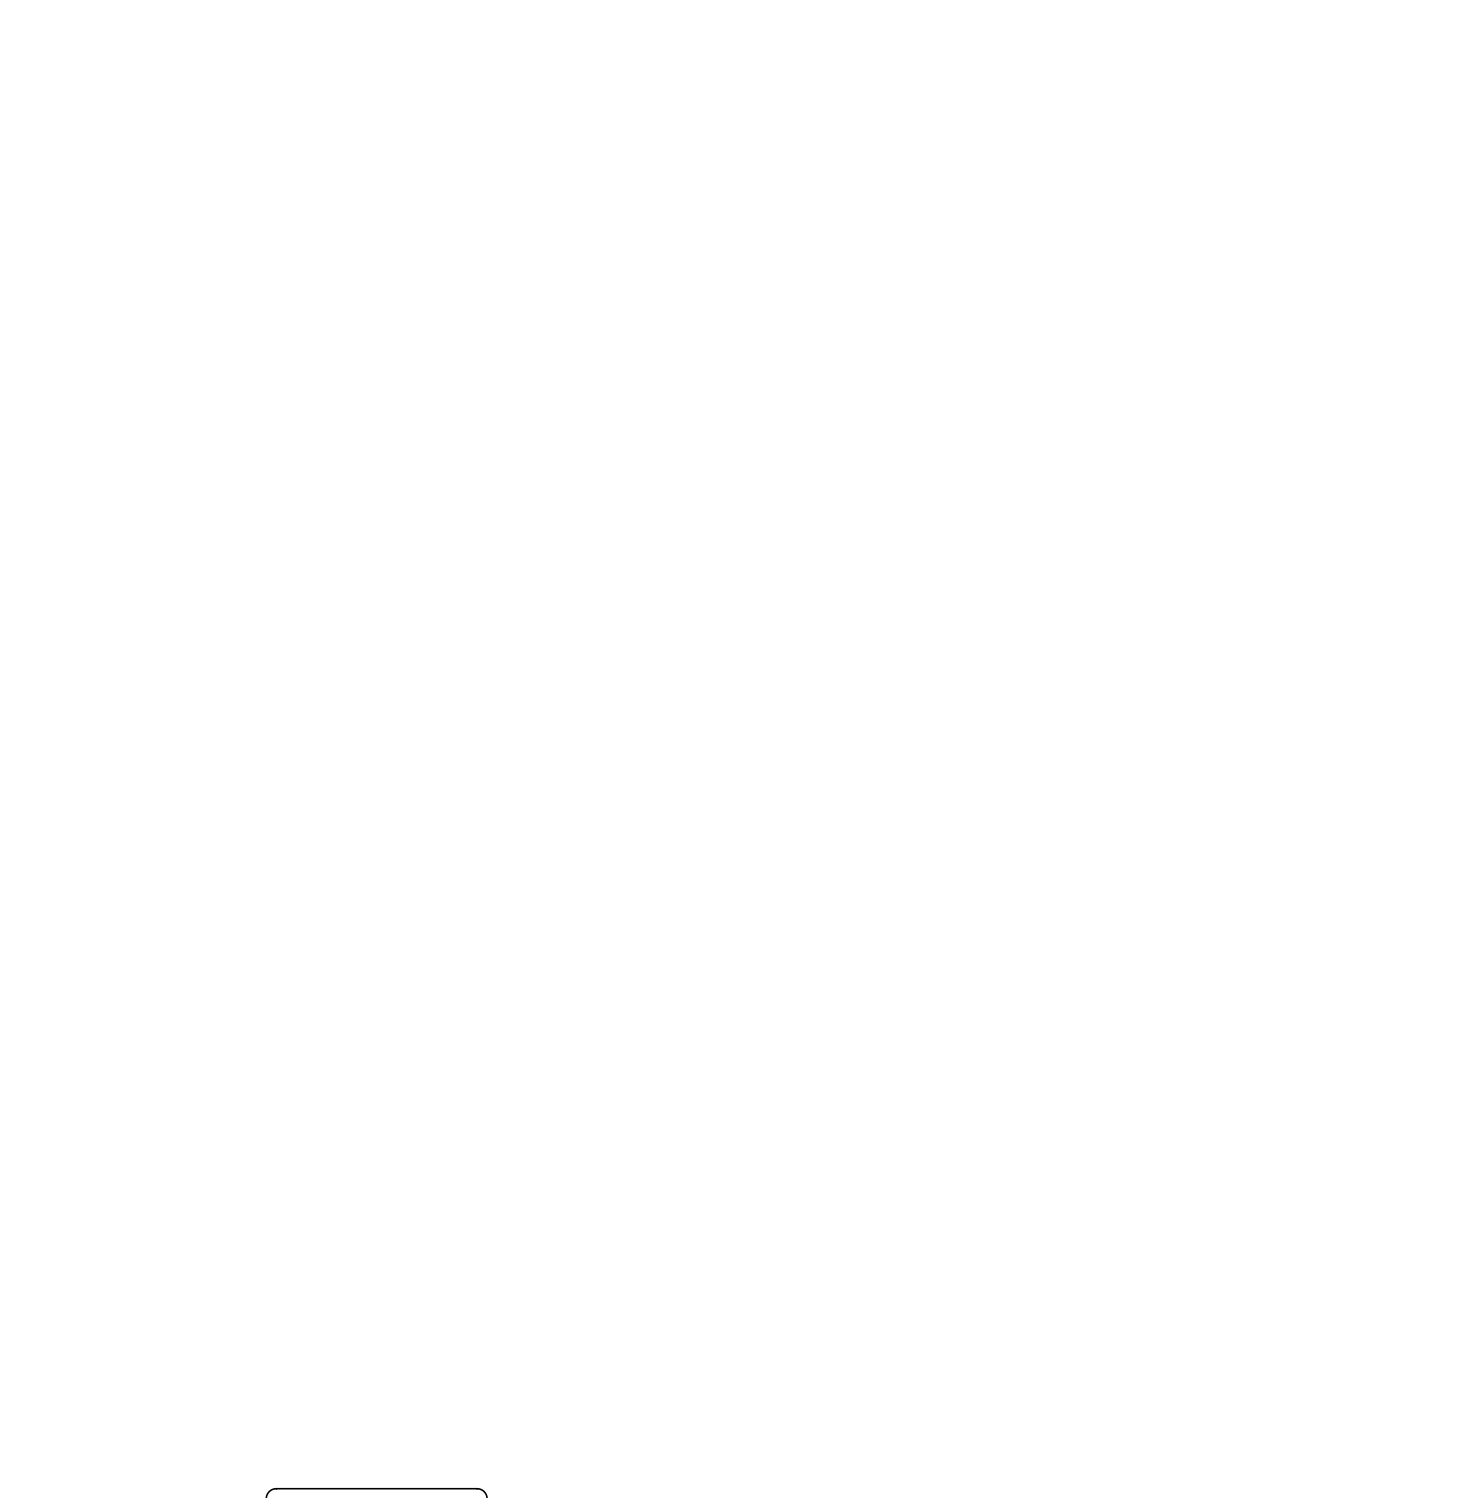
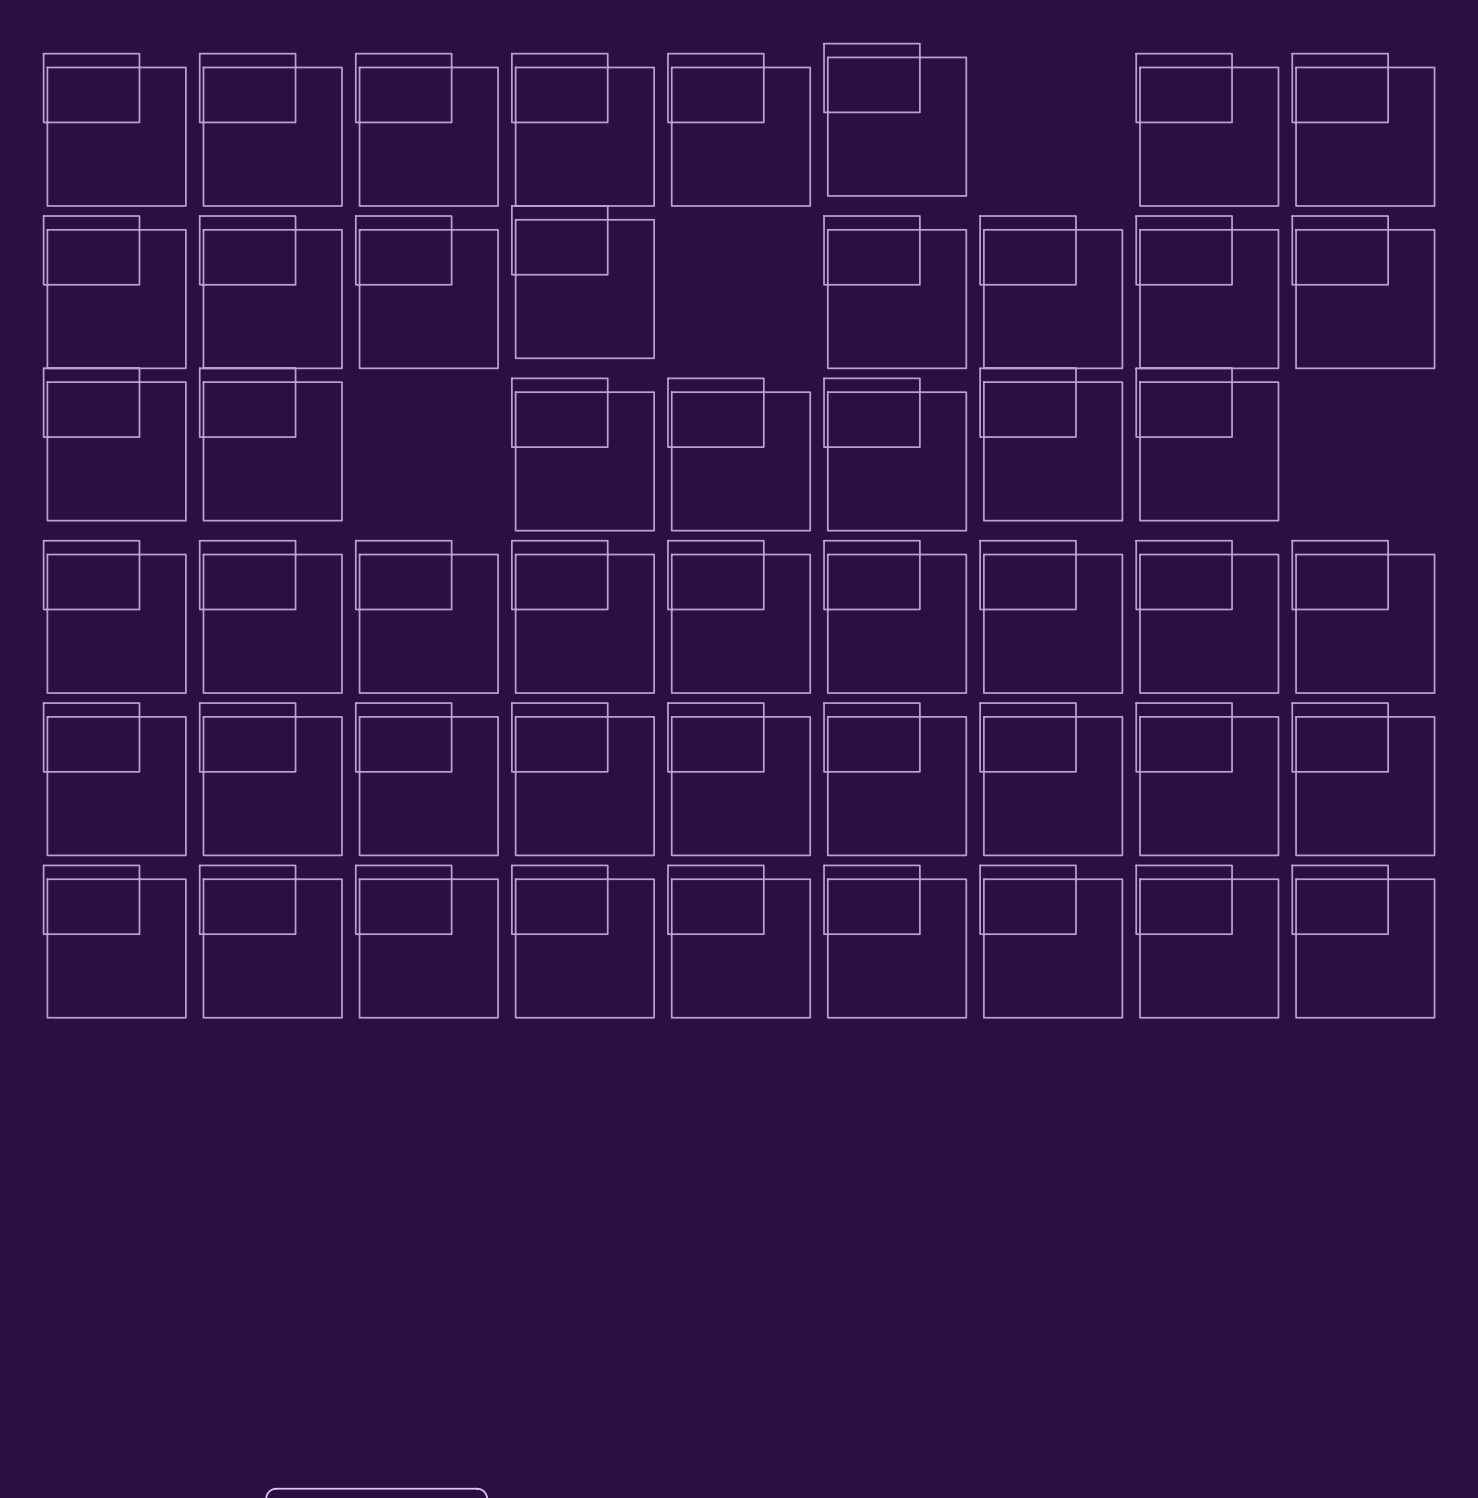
drawing: none -> [824, 43, 967, 196]
drawing: none -> [43, 53, 186, 521]
drawing: none -> [199, 53, 342, 521]
drawing: none -> [355, 53, 499, 369]
drawing: none -> [511, 53, 655, 359]
drawing: none -> [667, 53, 811, 206]
drawing: none -> [1136, 53, 1279, 521]
drawing: none -> [1292, 53, 1435, 369]
drawing: none -> [824, 216, 967, 1018]
drawing: none -> [980, 216, 1123, 521]
drawing: none -> [511, 378, 655, 1018]
drawing: none -> [667, 378, 811, 1018]
drawing: none -> [43, 540, 186, 1018]
drawing: none -> [199, 540, 342, 1018]
drawing: none -> [355, 540, 499, 1018]
drawing: none -> [980, 540, 1123, 1018]
drawing: none -> [1136, 540, 1279, 1018]
drawing: none -> [1292, 540, 1435, 1018]

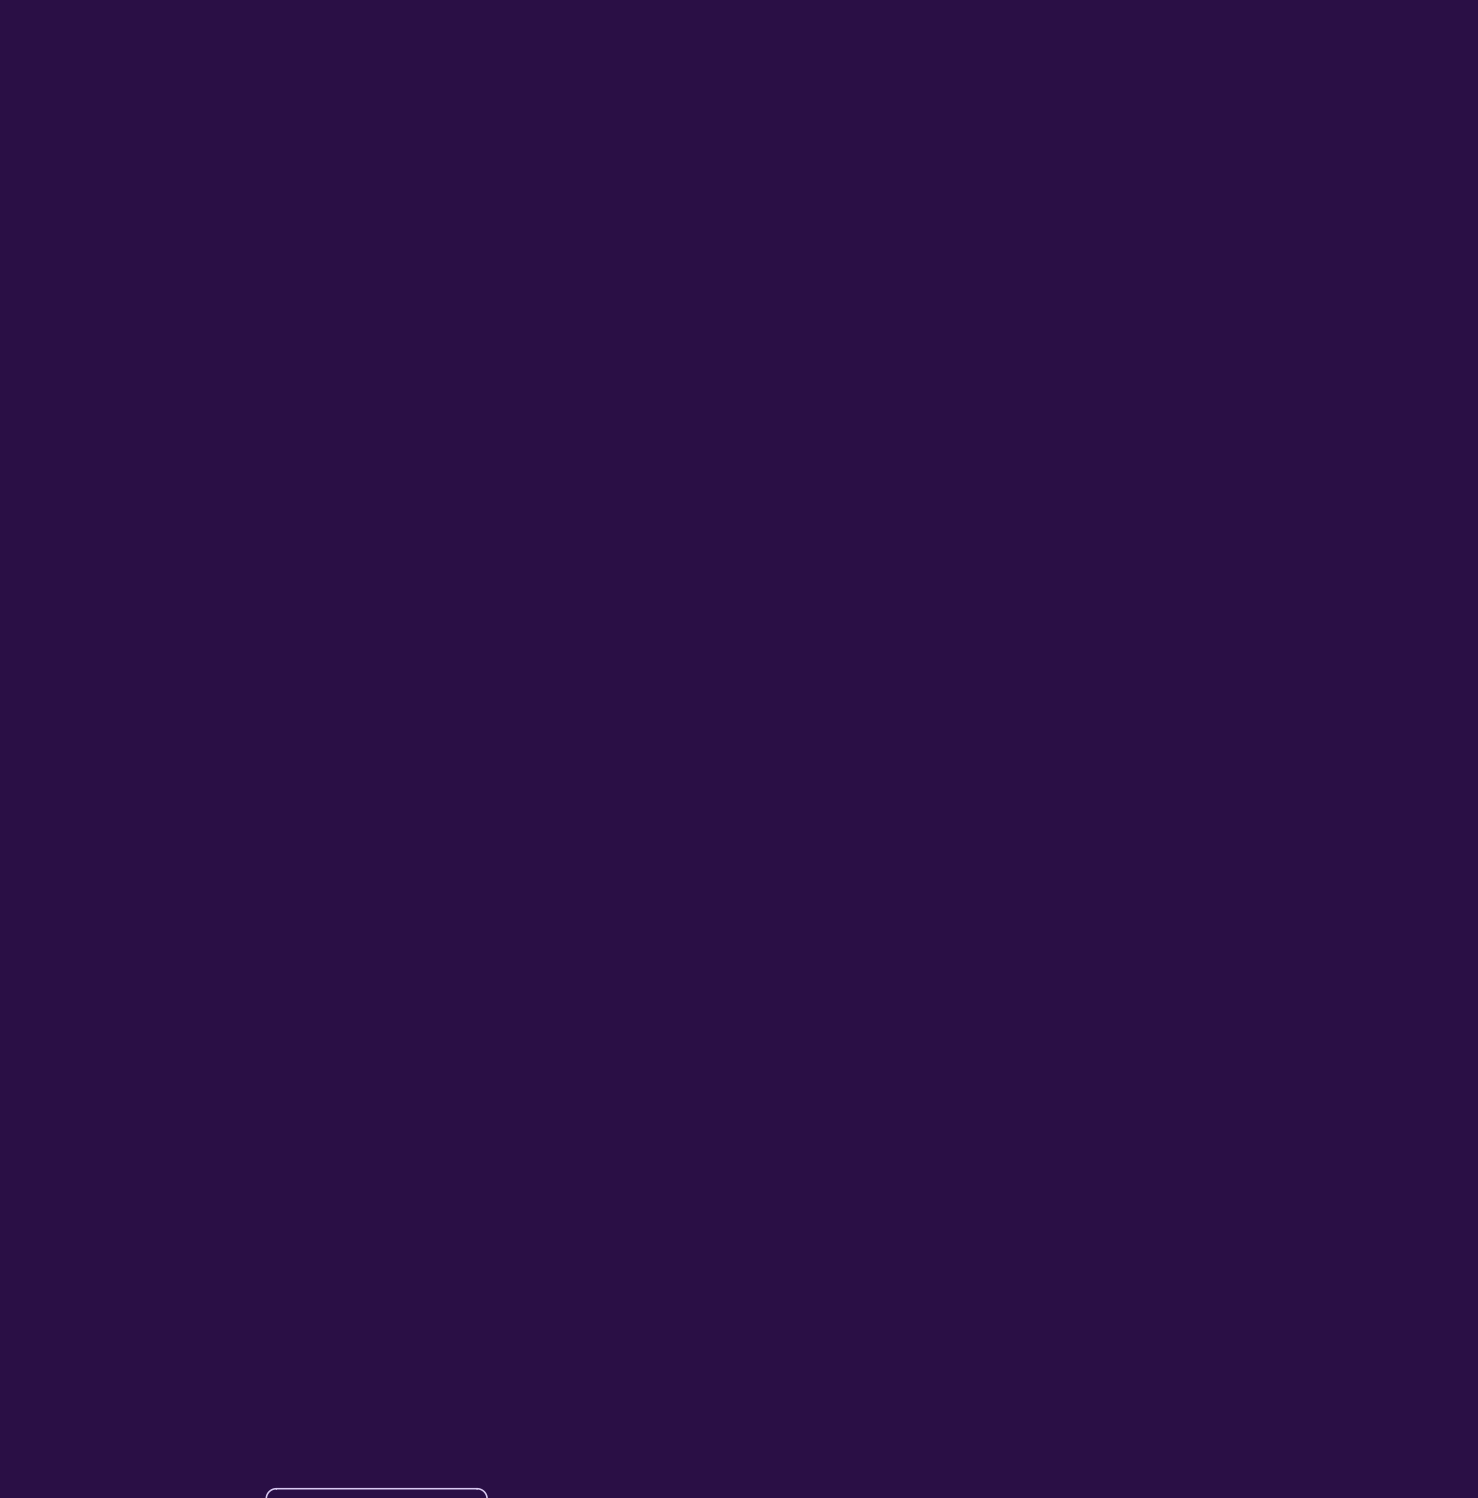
drawing: [824, 43, 967, 196] -> none
drawing: [43, 53, 186, 521] -> none
drawing: [199, 53, 342, 521] -> none
drawing: [355, 53, 499, 369] -> none
drawing: [511, 53, 655, 359] -> none
drawing: [667, 53, 811, 206] -> none
drawing: [1136, 53, 1279, 521] -> none
drawing: [1292, 53, 1435, 369] -> none
drawing: [824, 216, 967, 1018] -> none
drawing: [980, 216, 1123, 521] -> none
drawing: [511, 378, 655, 1018] -> none
drawing: [667, 378, 811, 1018] -> none
drawing: [43, 540, 186, 1018] -> none
drawing: [199, 540, 342, 1018] -> none
drawing: [355, 540, 499, 1018] -> none
drawing: [980, 540, 1123, 1018] -> none
drawing: [1136, 540, 1279, 1018] -> none
drawing: [1292, 540, 1435, 1018] -> none

